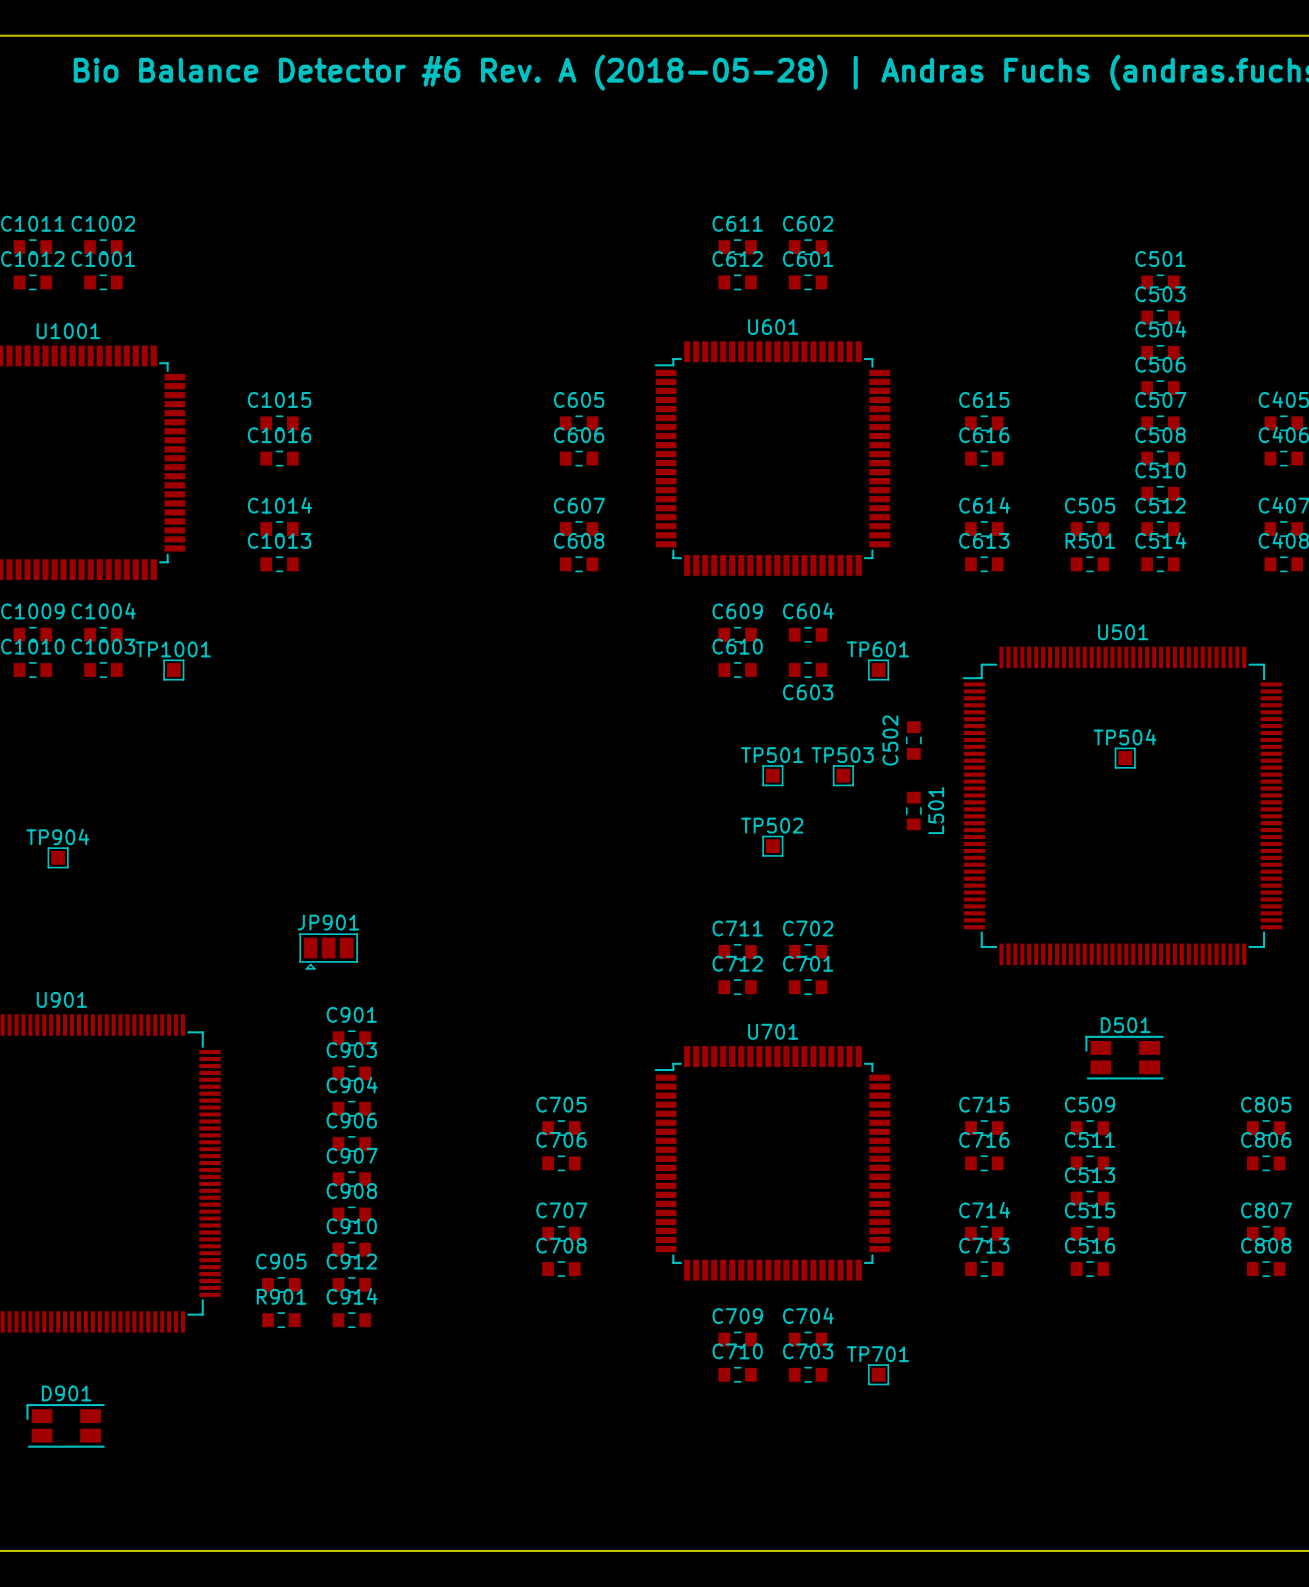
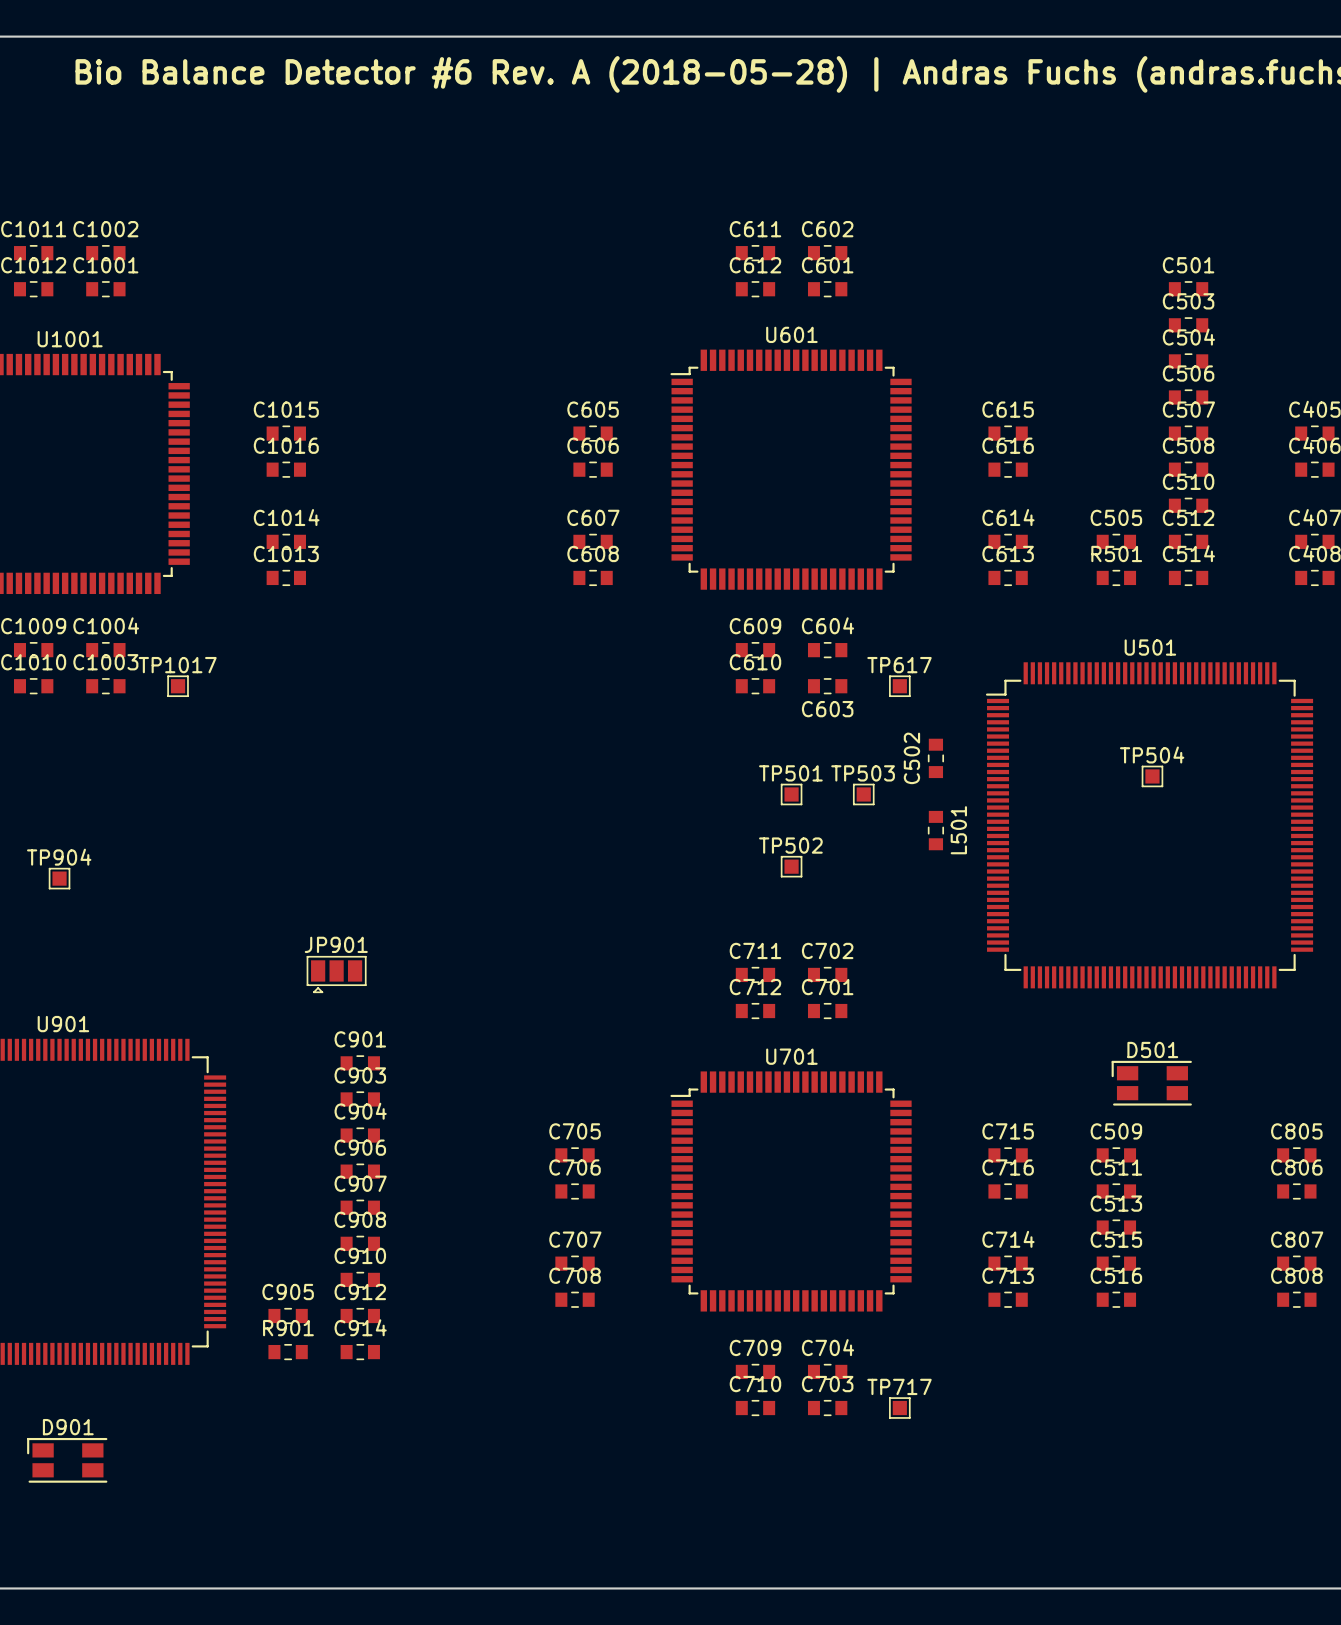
TP1001 name: TP1001 (173, 649) -> TP1017 (177, 665)
TP601 name: TP601 (877, 649) -> TP617 (899, 665)
TP701 name: TP701 (877, 1354) -> TP717 (899, 1386)

